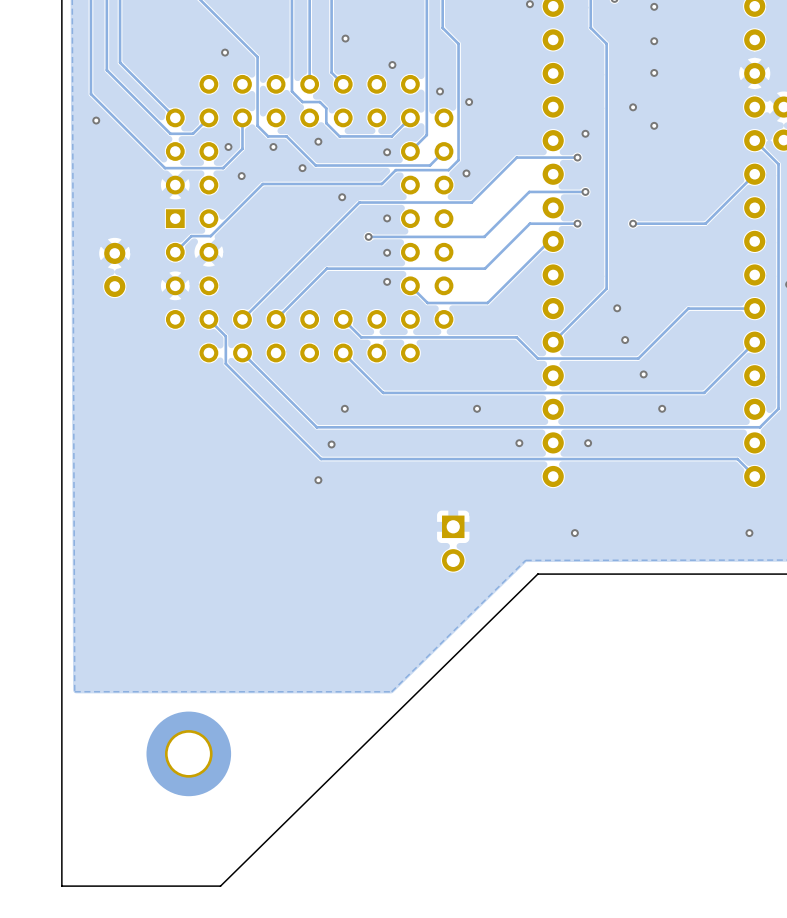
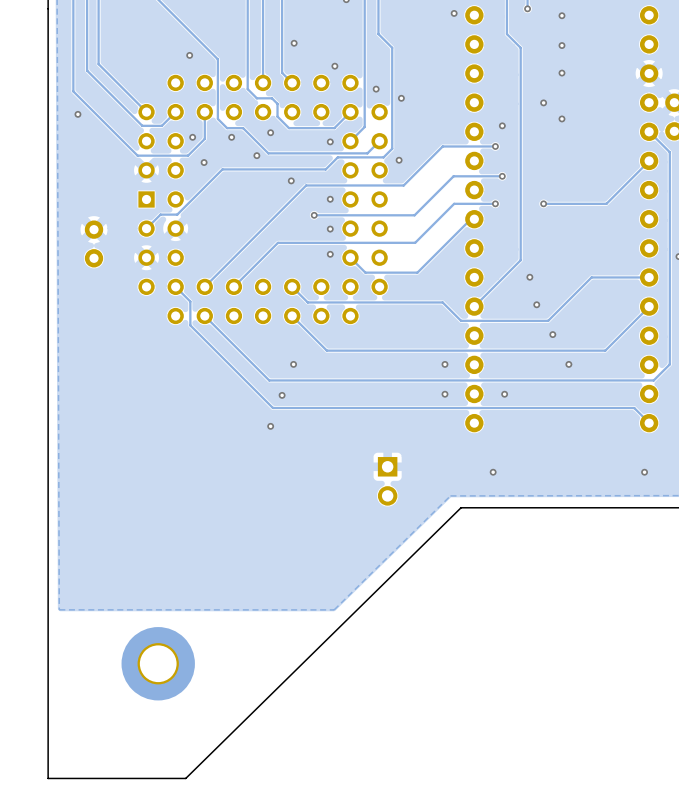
via position: (477, 408) -> (444, 364)

